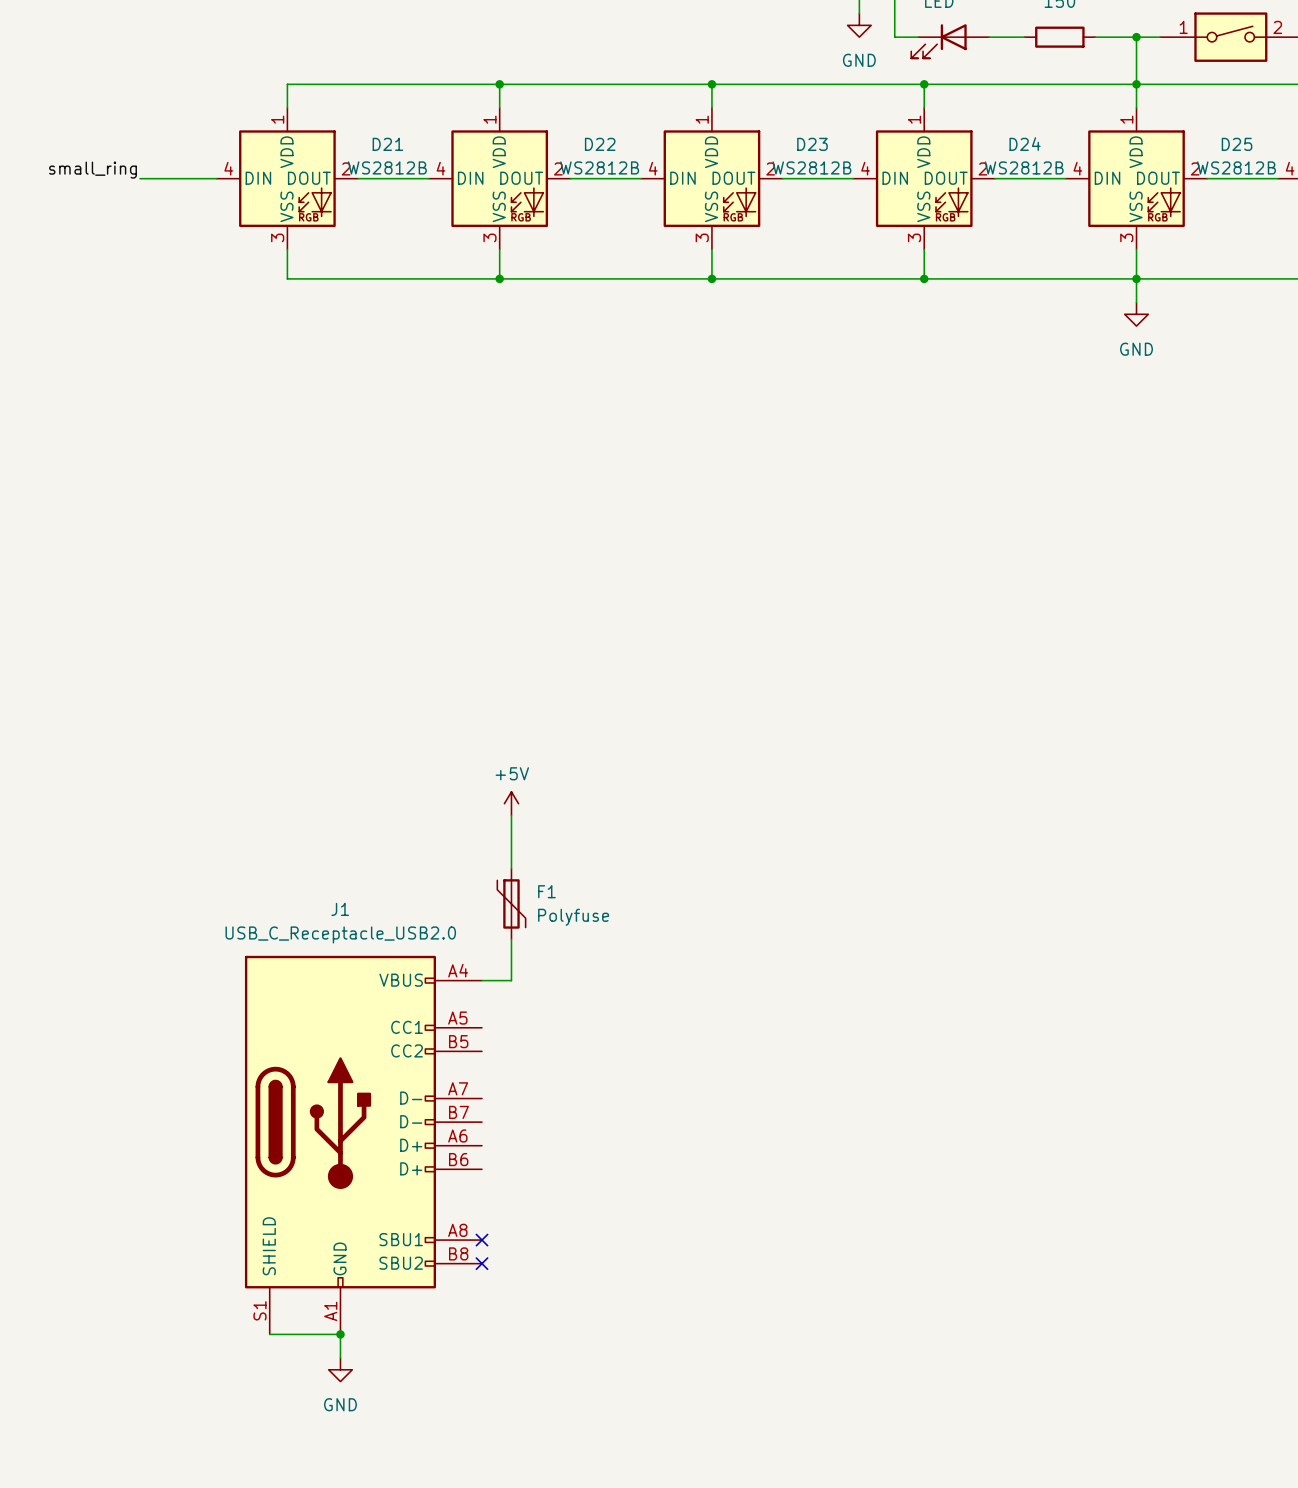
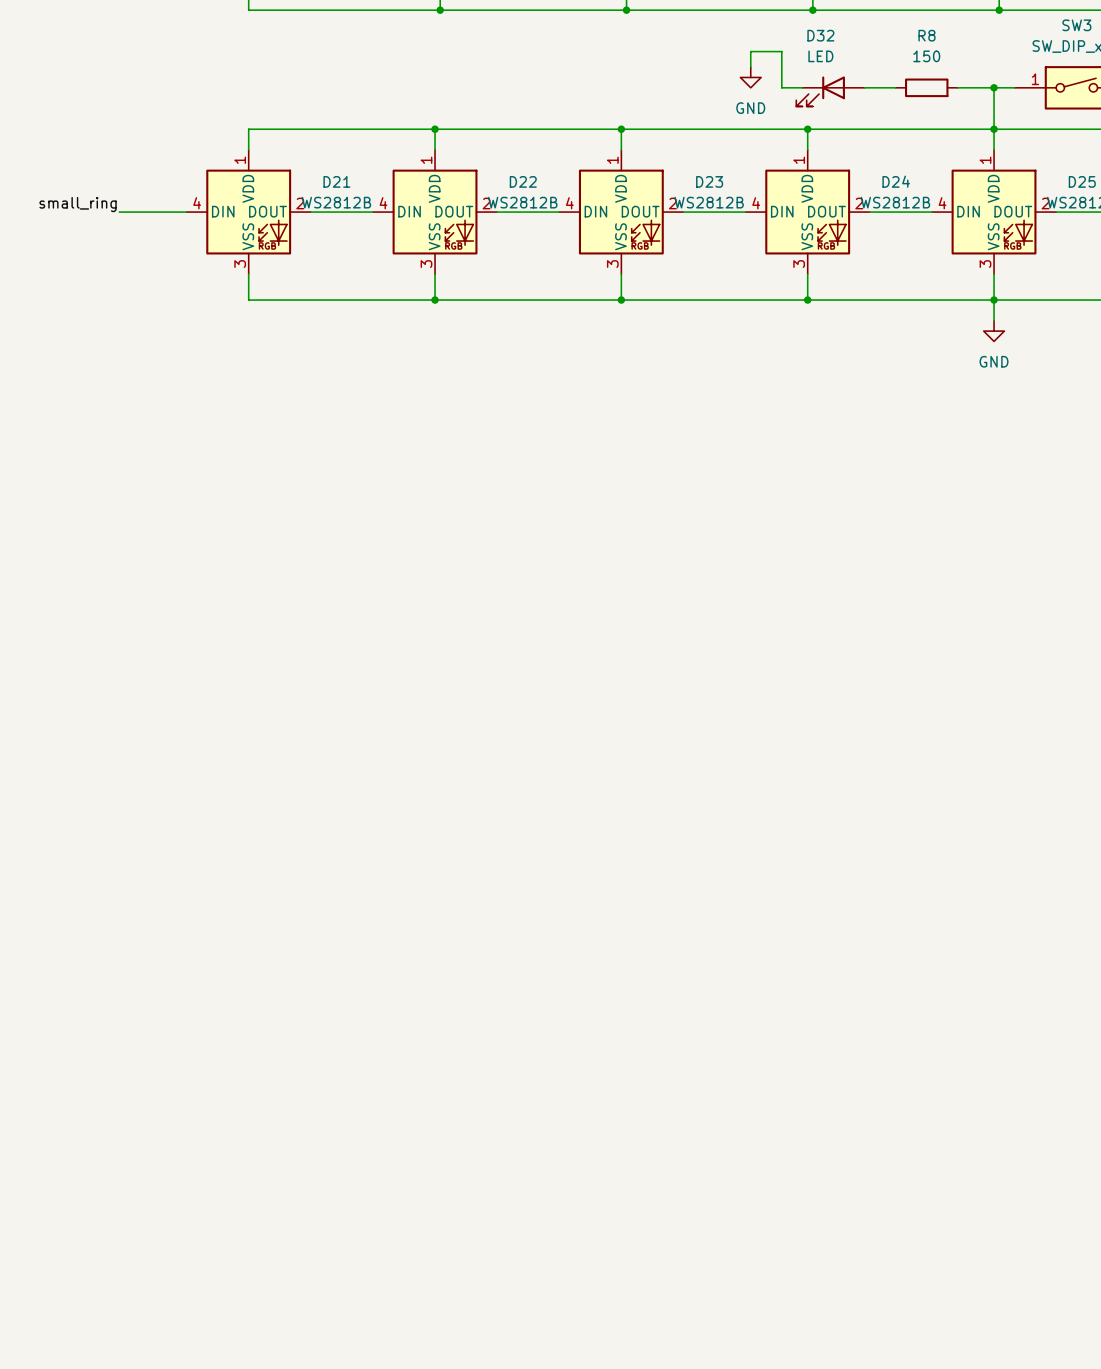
power symbol: +5V (511, 803) -> none
wire: (511, 815) (511, 868) -> none
F1: Polyfuse (511, 903) -> none
wire: (511, 939) (511, 980) (481, 980) -> none
J1: USB_C_Receptacle_USB2.0 (363, 1145) -> none
no-connect mark: (481, 1240) -> none
no-connect mark: (481, 1263) -> none
wire: (269, 1334) (340, 1334) (340, 1357) -> none
junction: (340, 1334) -> none
power symbol: GND (340, 1369) -> none

